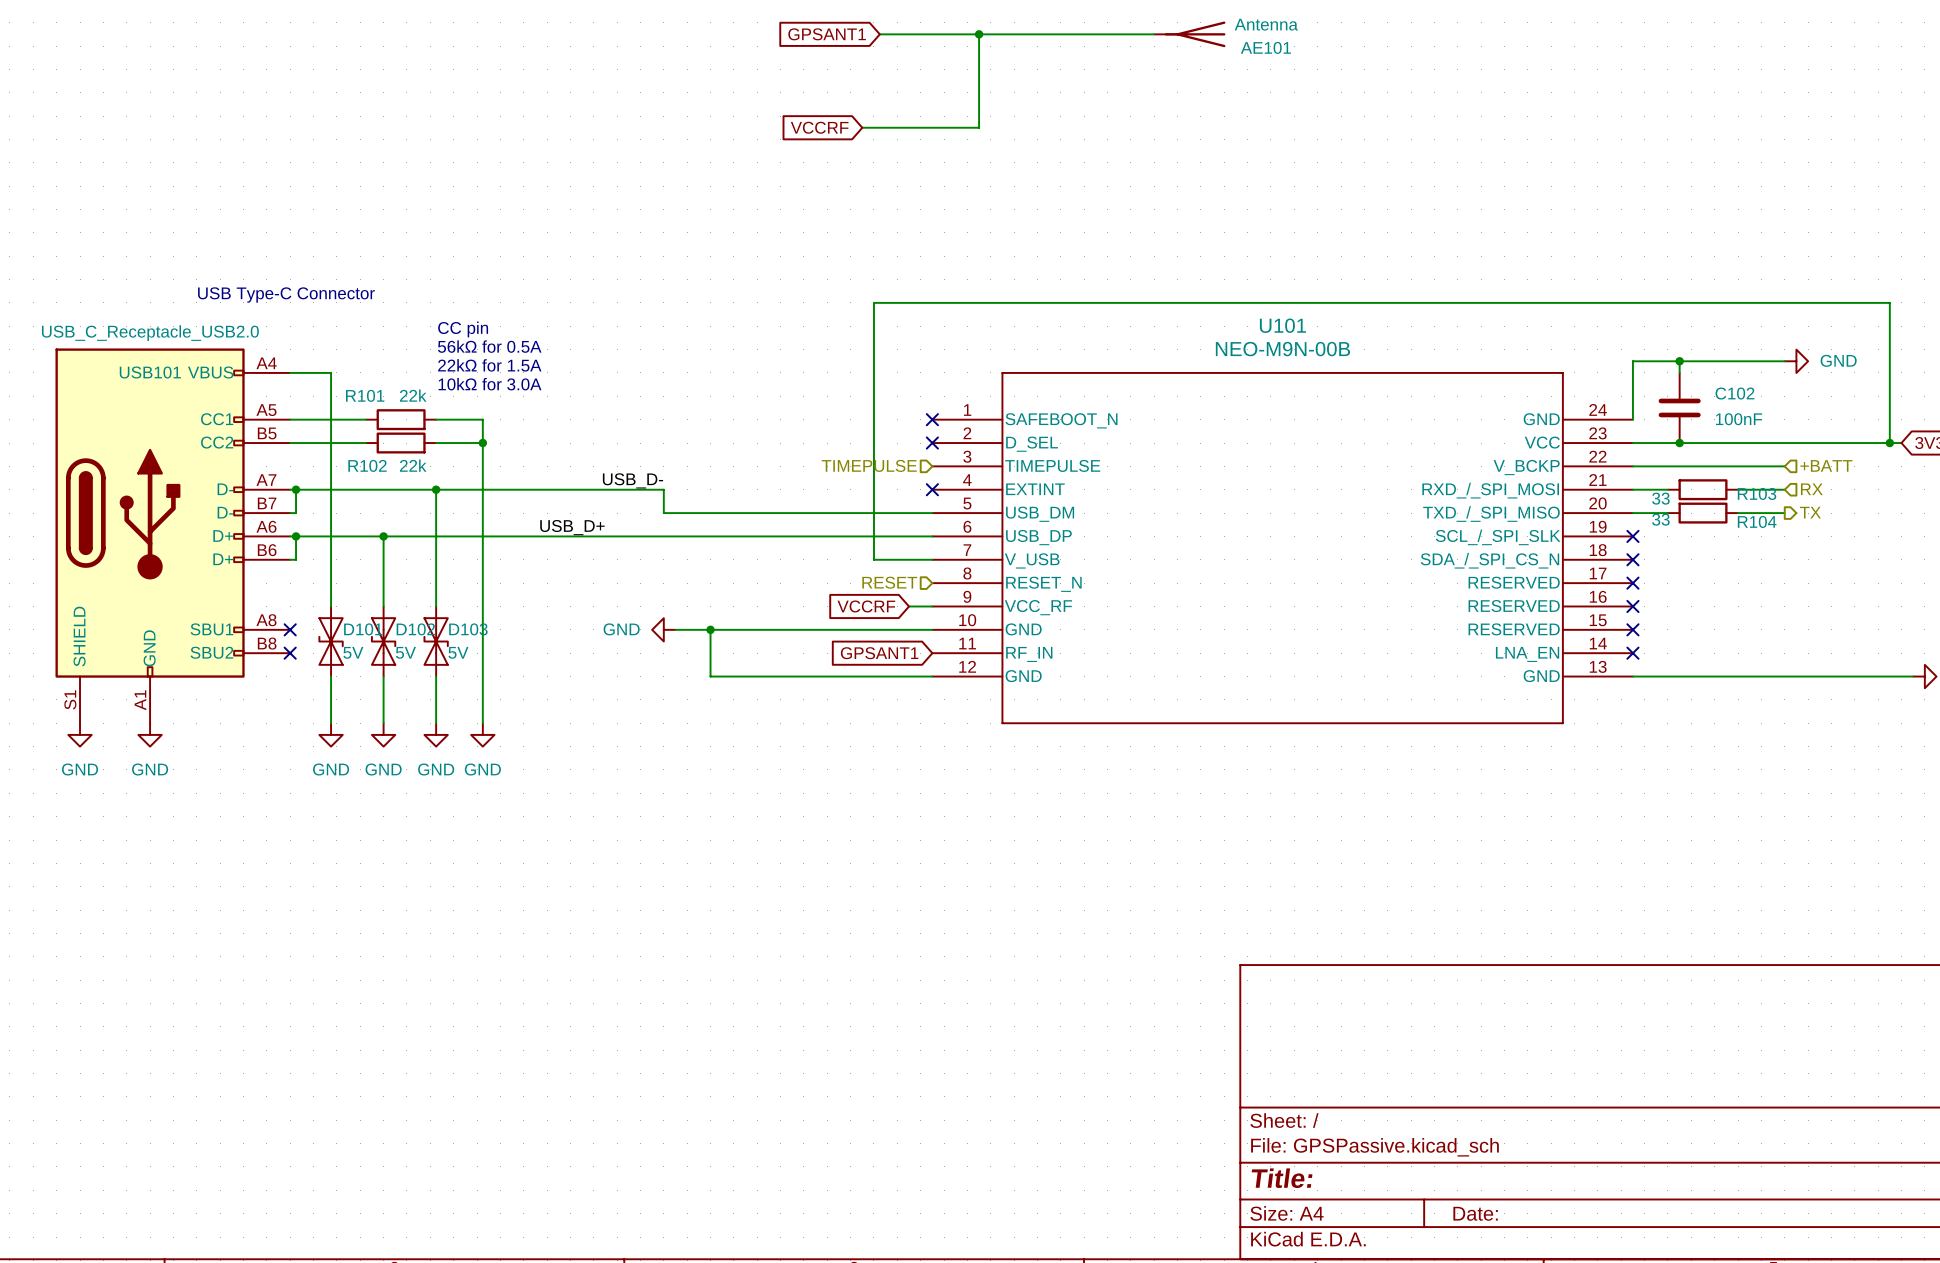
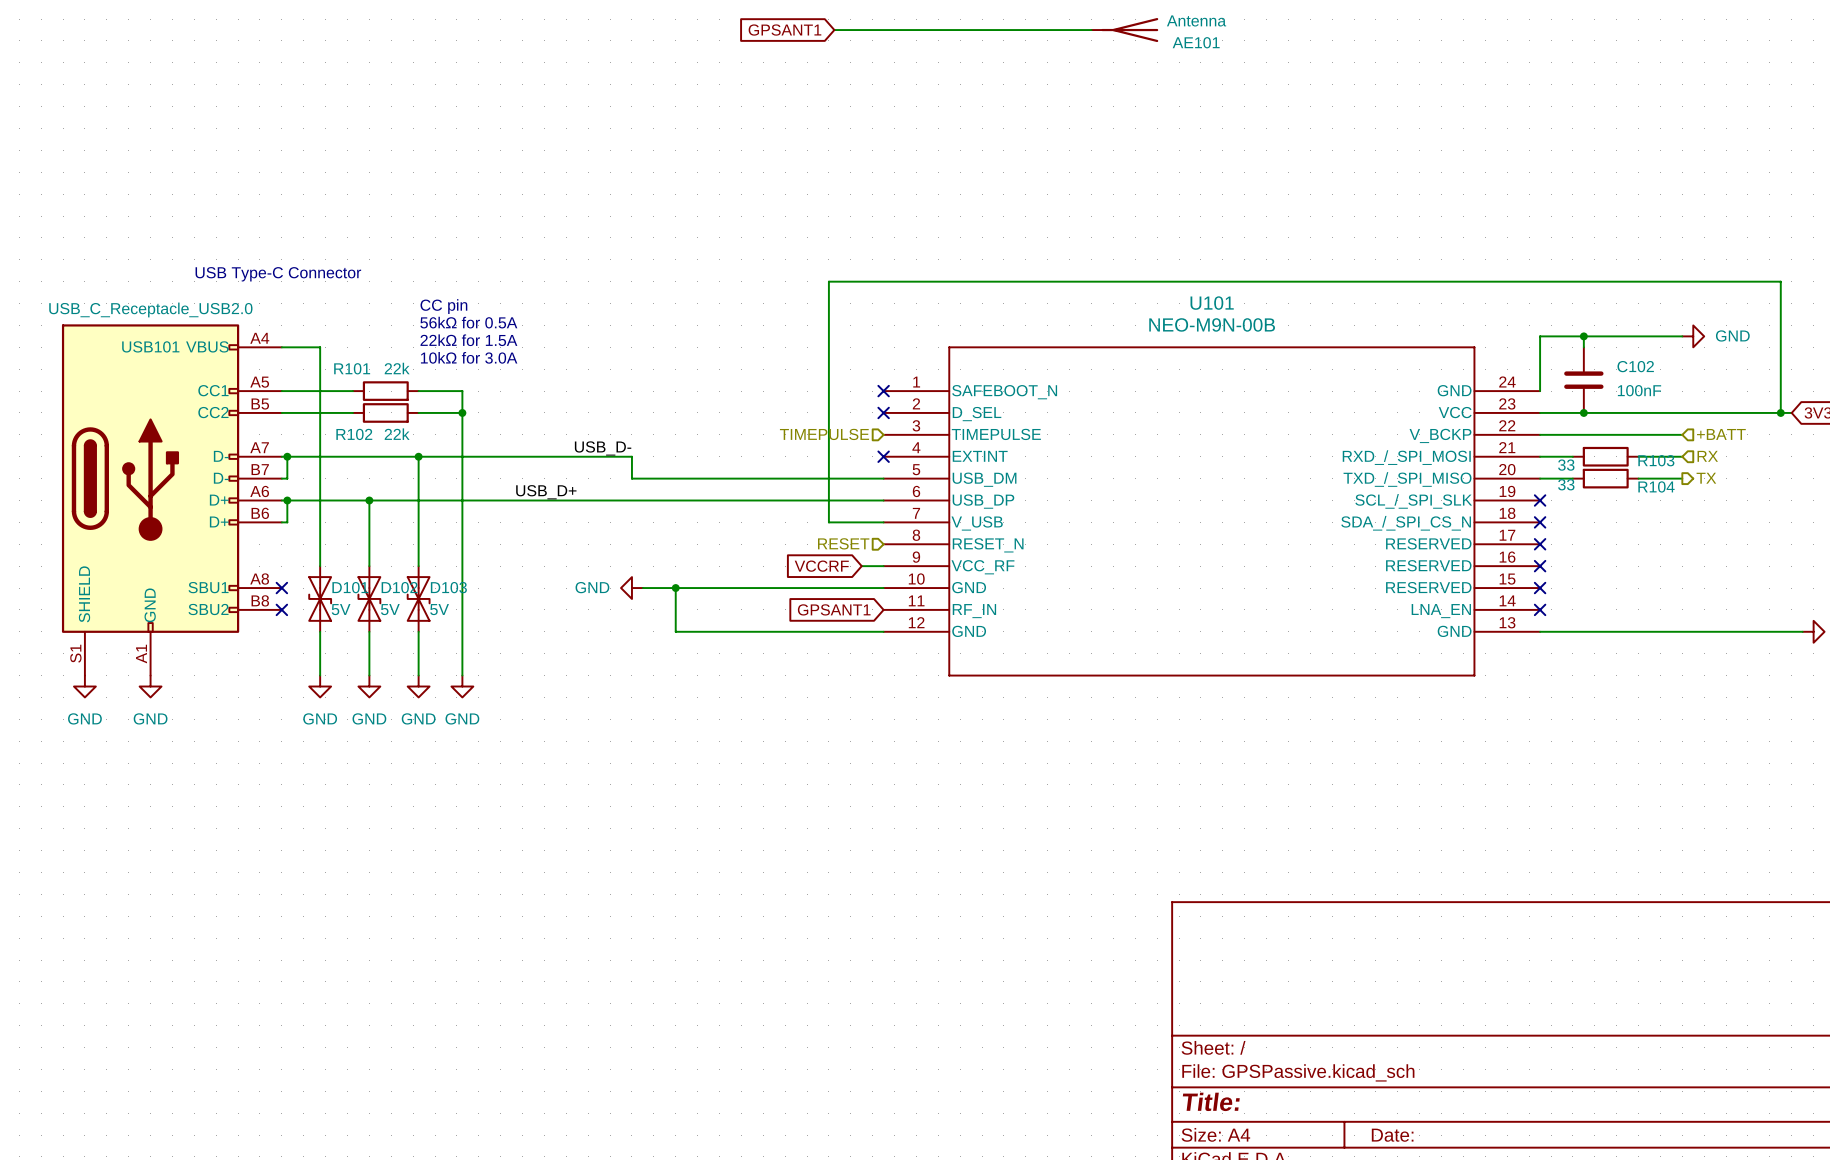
wire: (979, 34) (979, 127) (862, 127) -> none
junction: (979, 34) -> none
global label: VCCRF (819, 127) -> none

